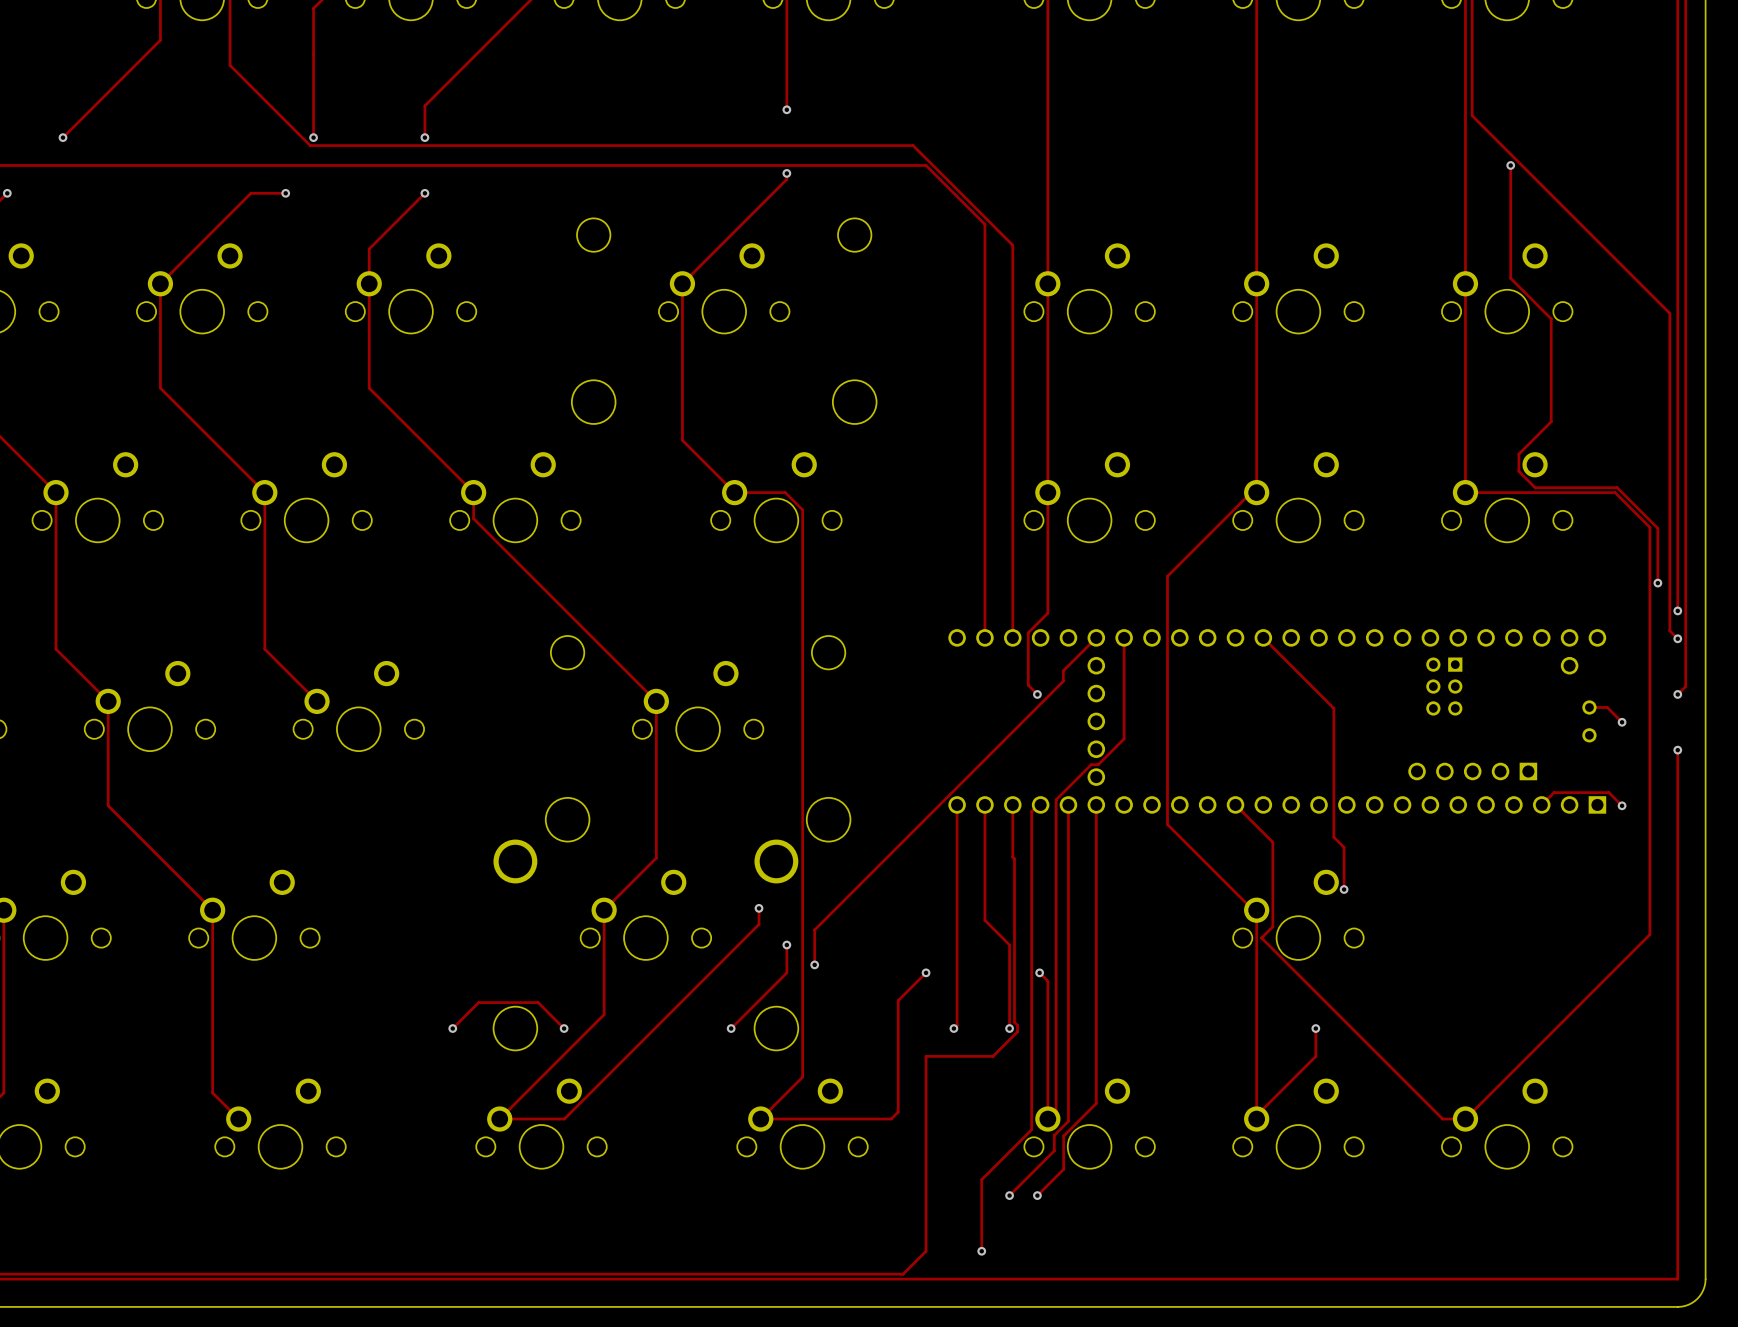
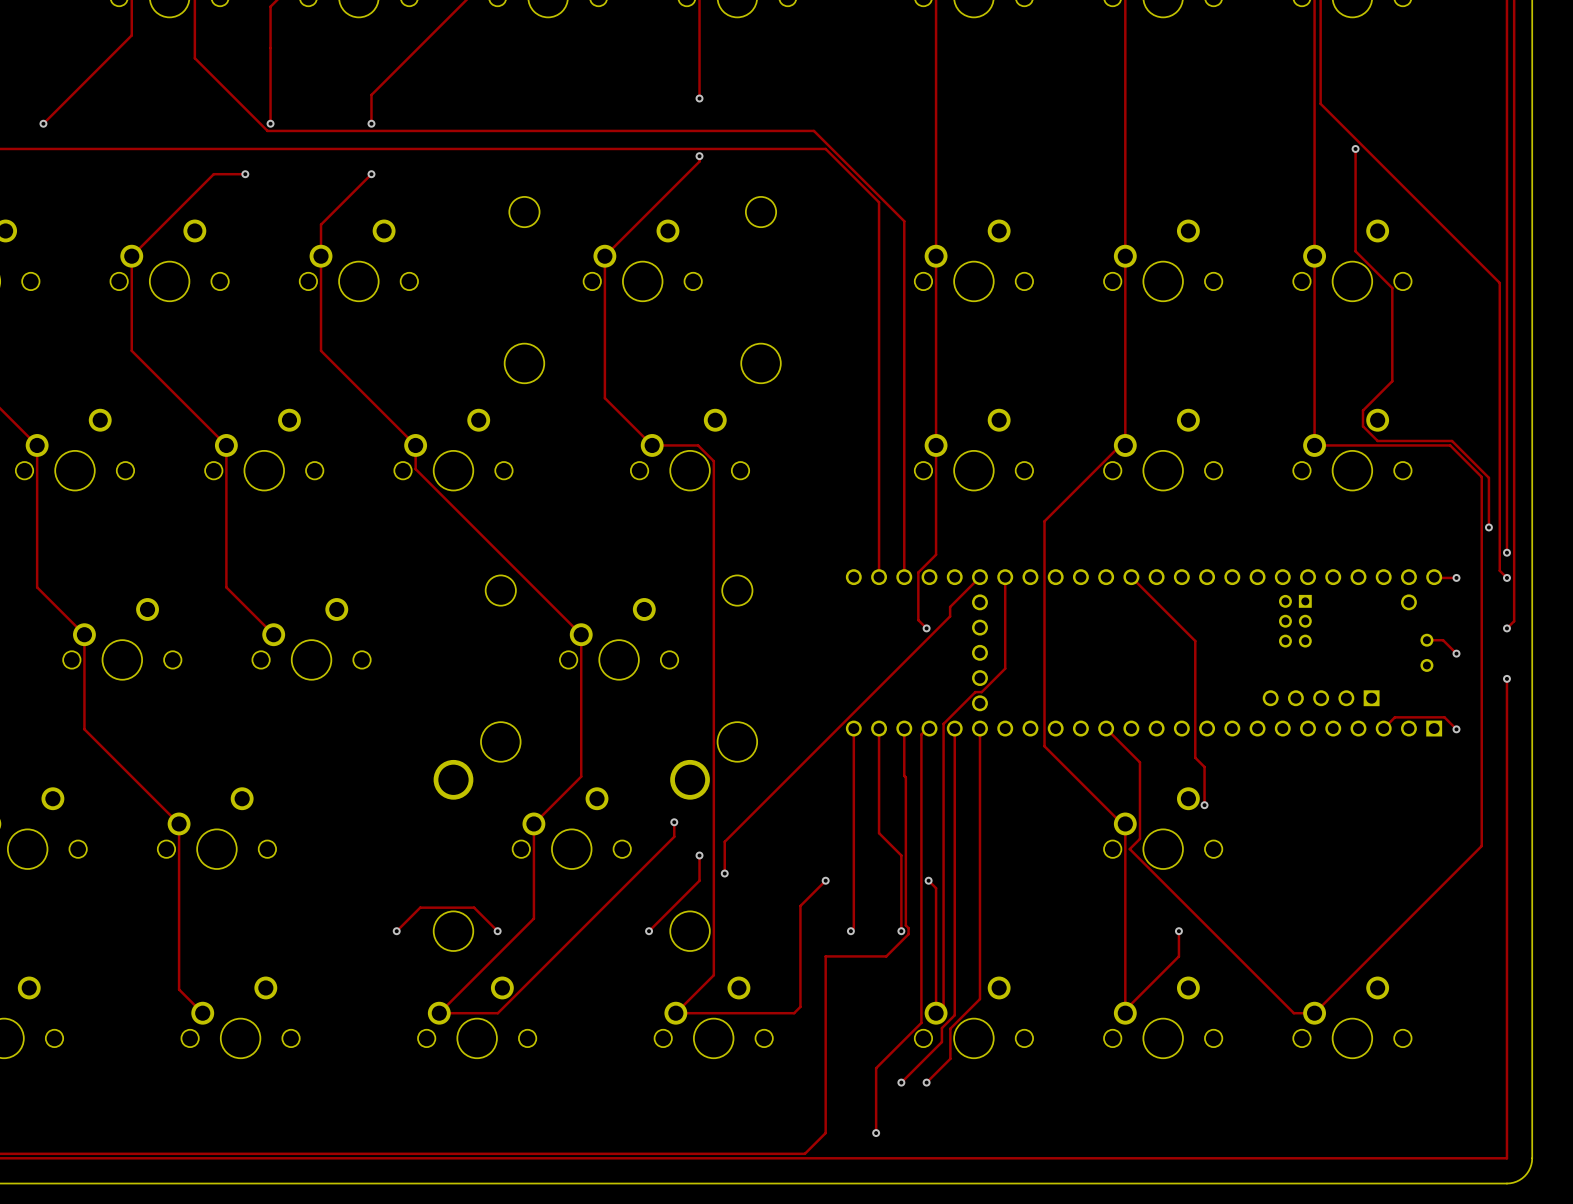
track: none -> (1434, 577) (1456, 577)
via: none -> (1456, 577)

